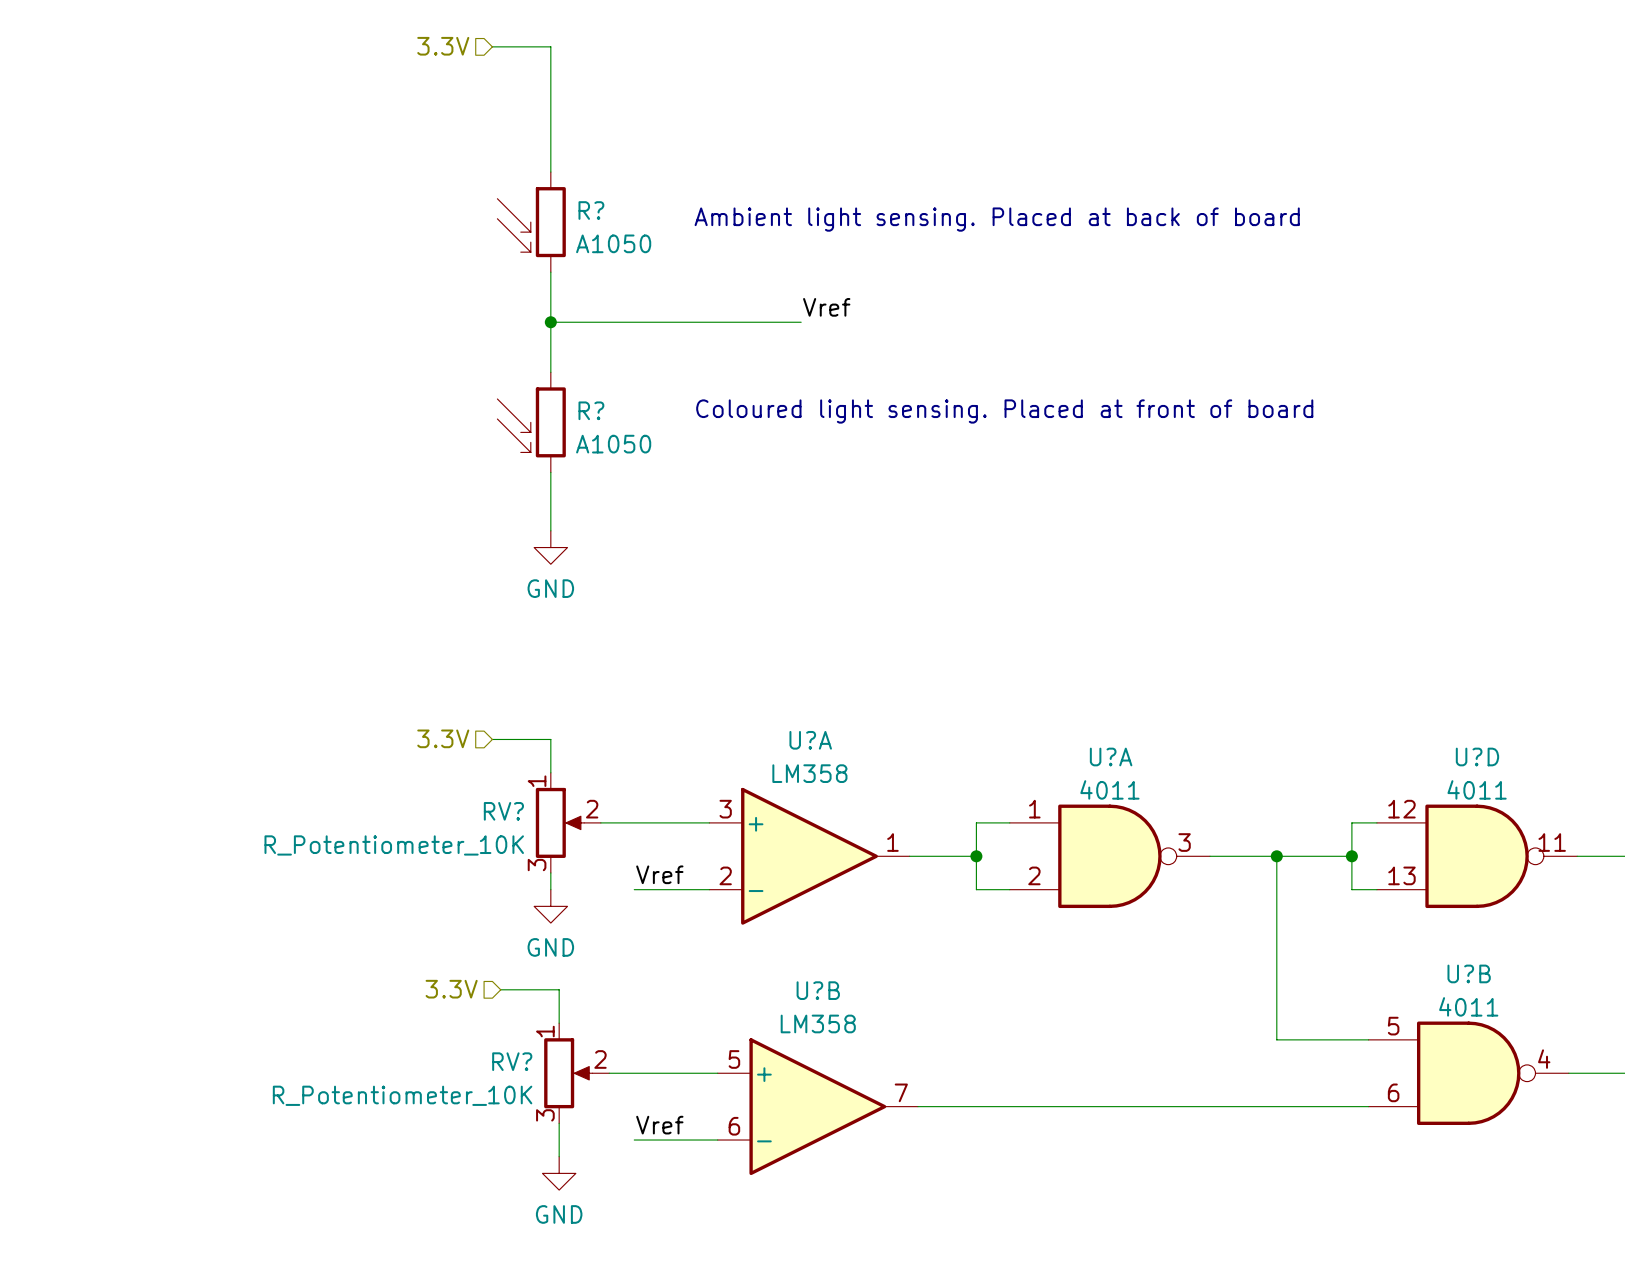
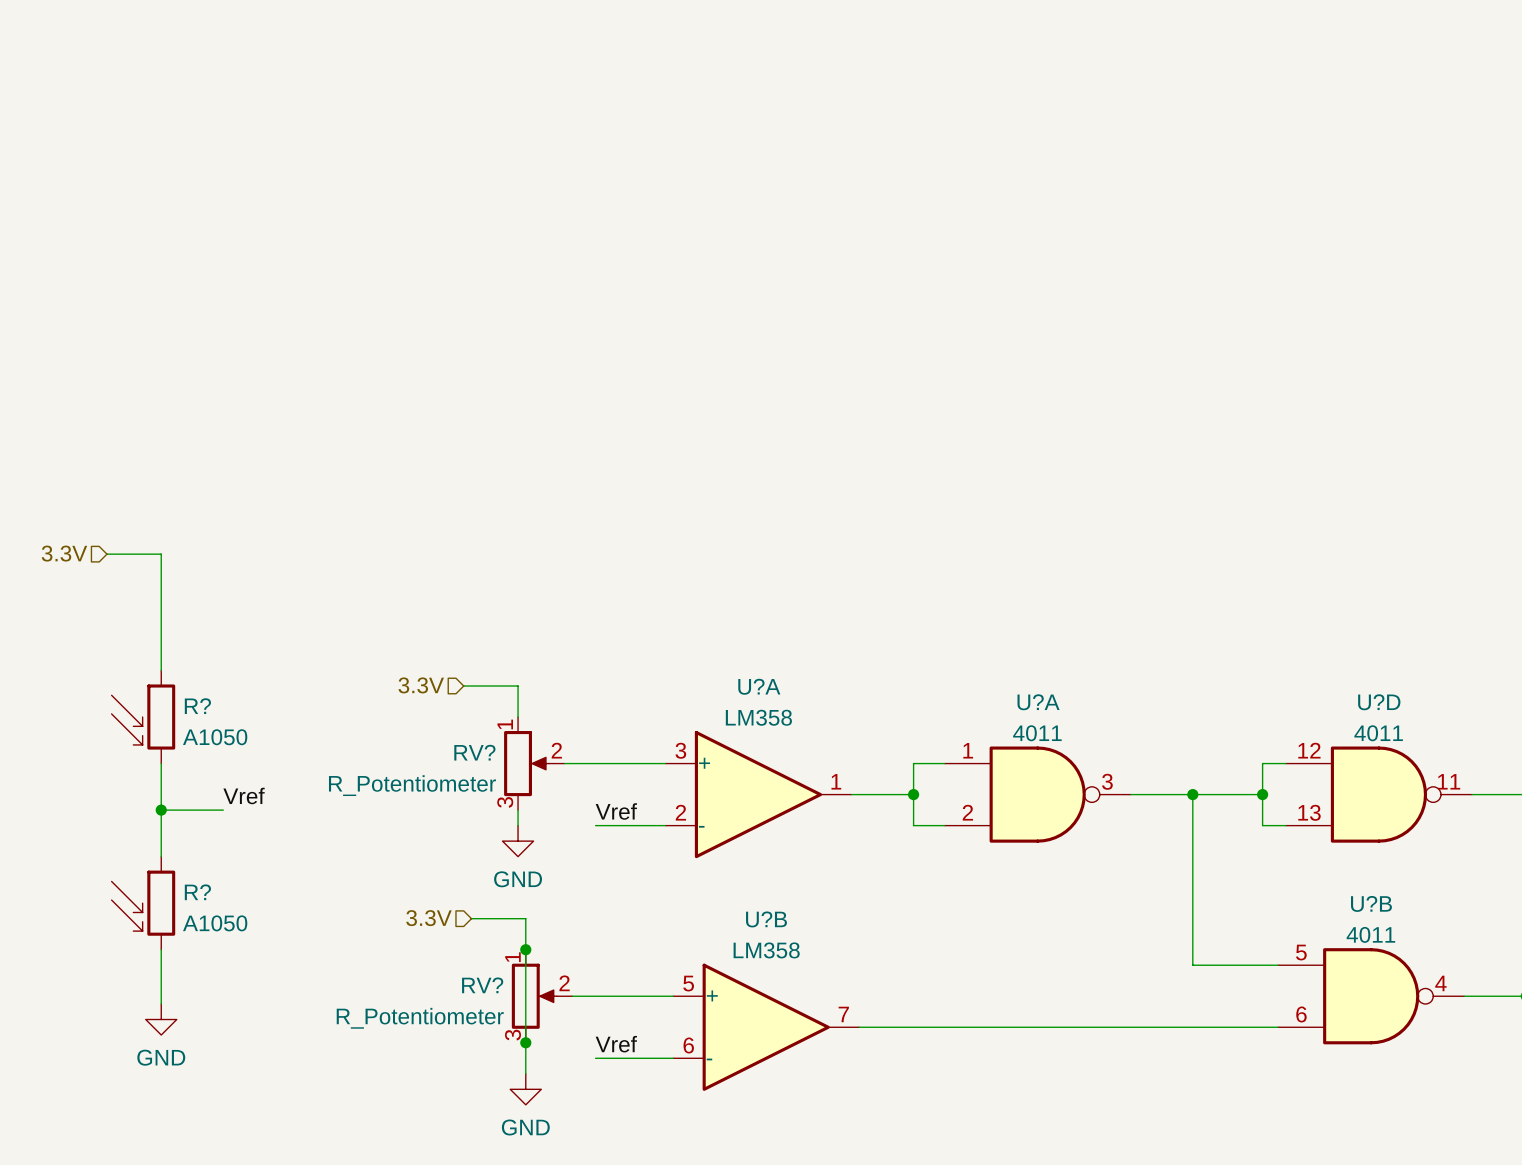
hierarchical label: 3.3V (443, 46) -> none
wire: (492, 46) (550, 46) (550, 172) -> none
text: Ambient light sensing. Placed at back of board (997, 219) -> none
R?: A1050 (531, 222) -> none
wire: (550, 272) (550, 372) -> none
label: Vref (826, 307) -> none
wire: (550, 322) (801, 322) -> none
junction: (550, 322) -> none
text: Coloured light sensing. Placed at front of board (1004, 411) -> none
R?: A1050 (531, 422) -> none
wire: (550, 472) (550, 530) -> none
power symbol: GND (550, 547) -> none
hierarchical label: none -> 3.3V (64, 553)
wire: none -> (106, 554) (161, 554) (161, 670)
R?: none -> A1050 (143, 717)
wire: none -> (161, 763) (161, 856)
RV? value: R_Potentiometer_10K (394, 845) -> R_Potentiometer (412, 785)
label: none -> Vref (244, 795)
wire: none -> (161, 810) (223, 810)
junction: none -> (161, 810)
R?: none -> A1050 (143, 903)
wire: none -> (161, 949) (161, 1004)
wire: none -> (525, 949) (525, 1042)
junction: none -> (525, 949)
RV? value: R_Potentiometer_10K (402, 1095) -> R_Potentiometer (420, 1018)
power symbol: none -> GND (161, 1019)
junction: none -> (525, 1042)

